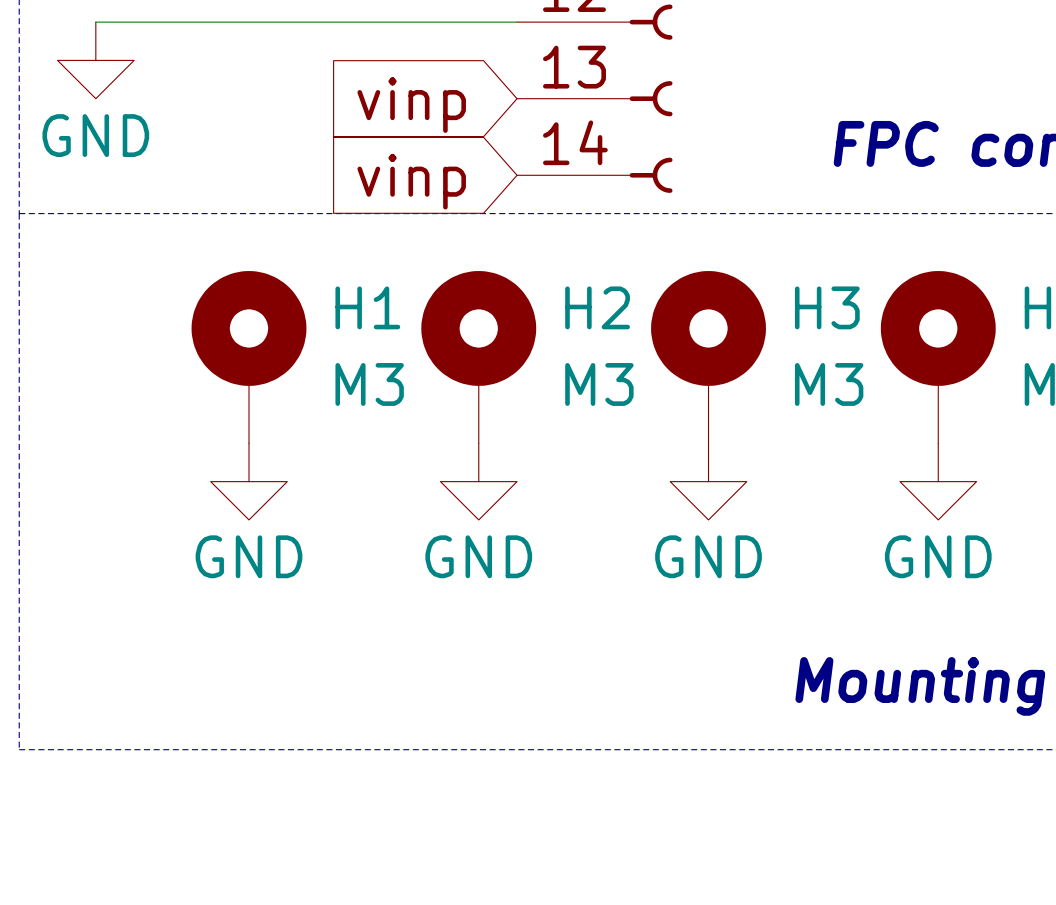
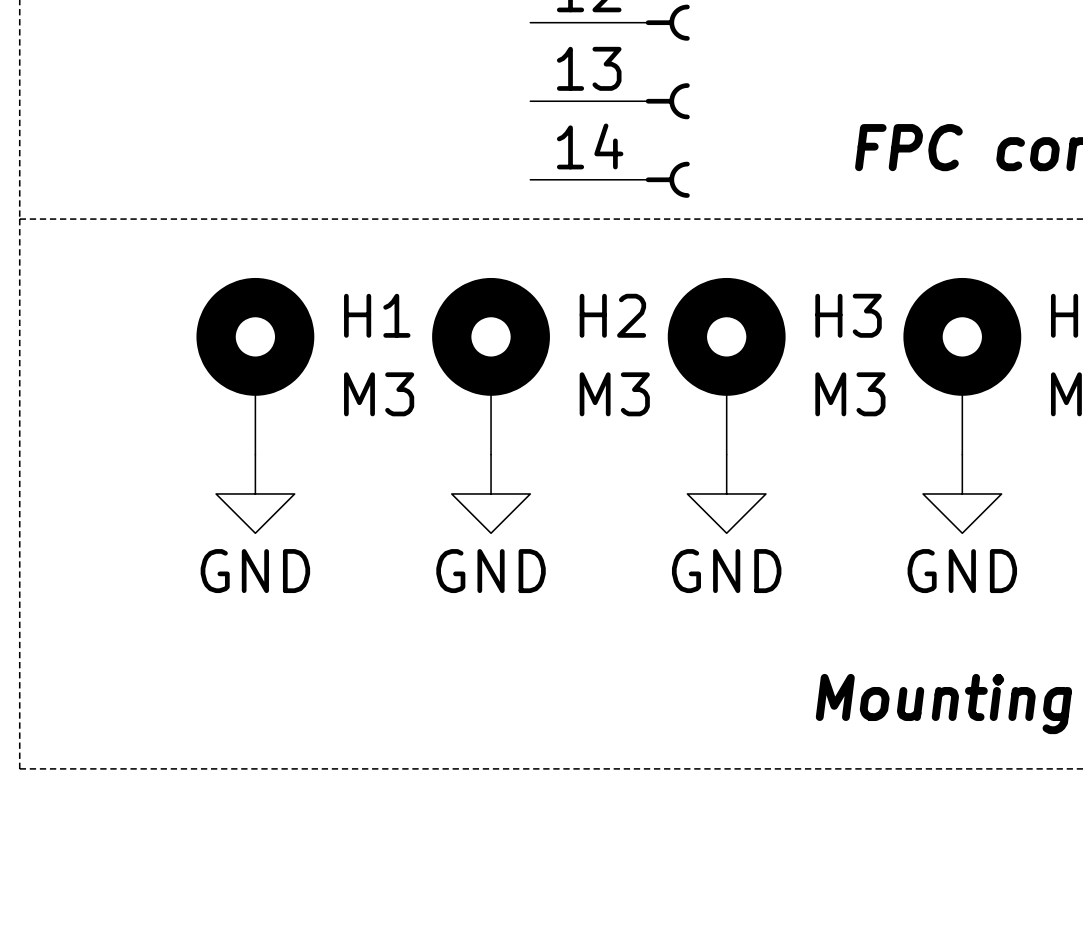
wire: (95, 22) (517, 22) -> none
power symbol: GND (95, 60) -> none
global label: vinp (411, 105) -> none
global label: vinp (411, 181) -> none

